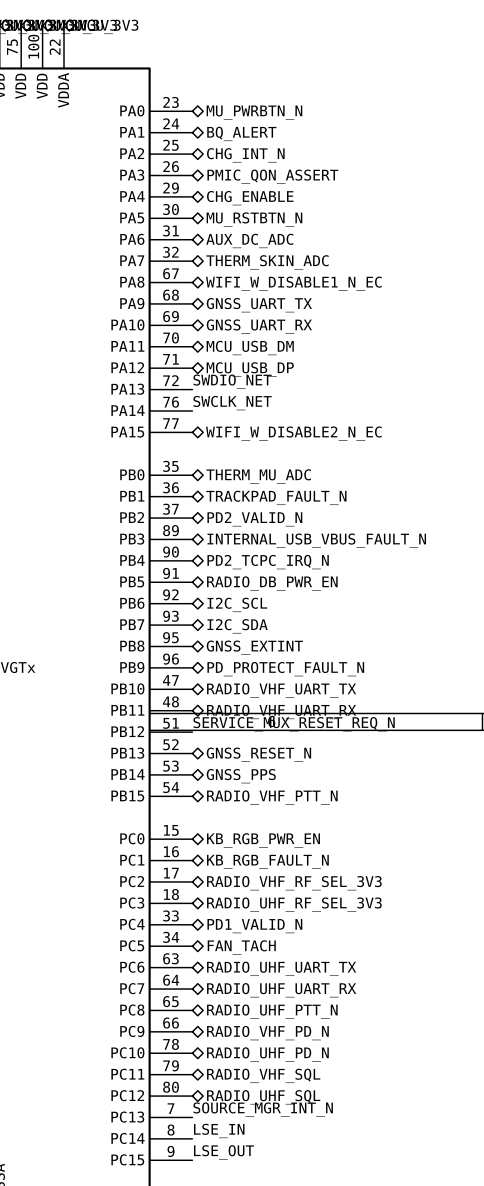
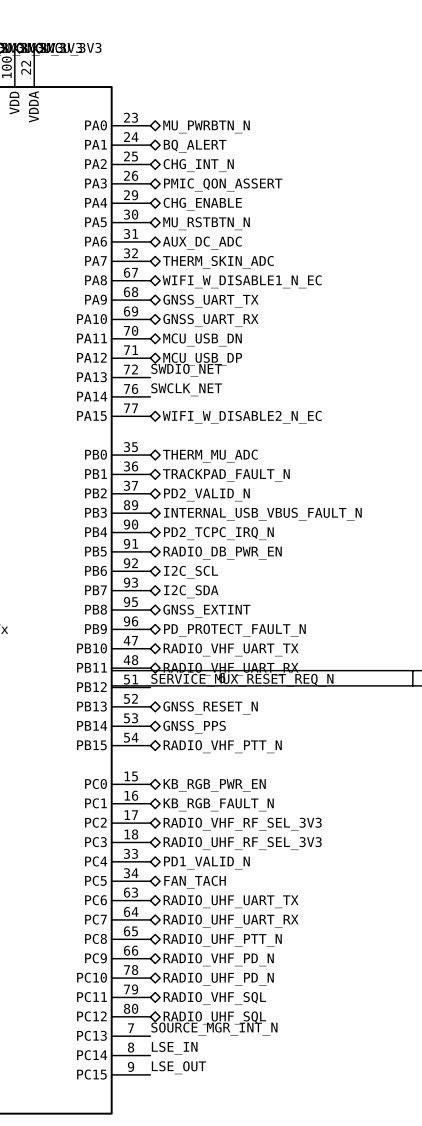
hierarchical label: MCU_USB_DM (250, 348) -> MCU_USB_DN (202, 339)

